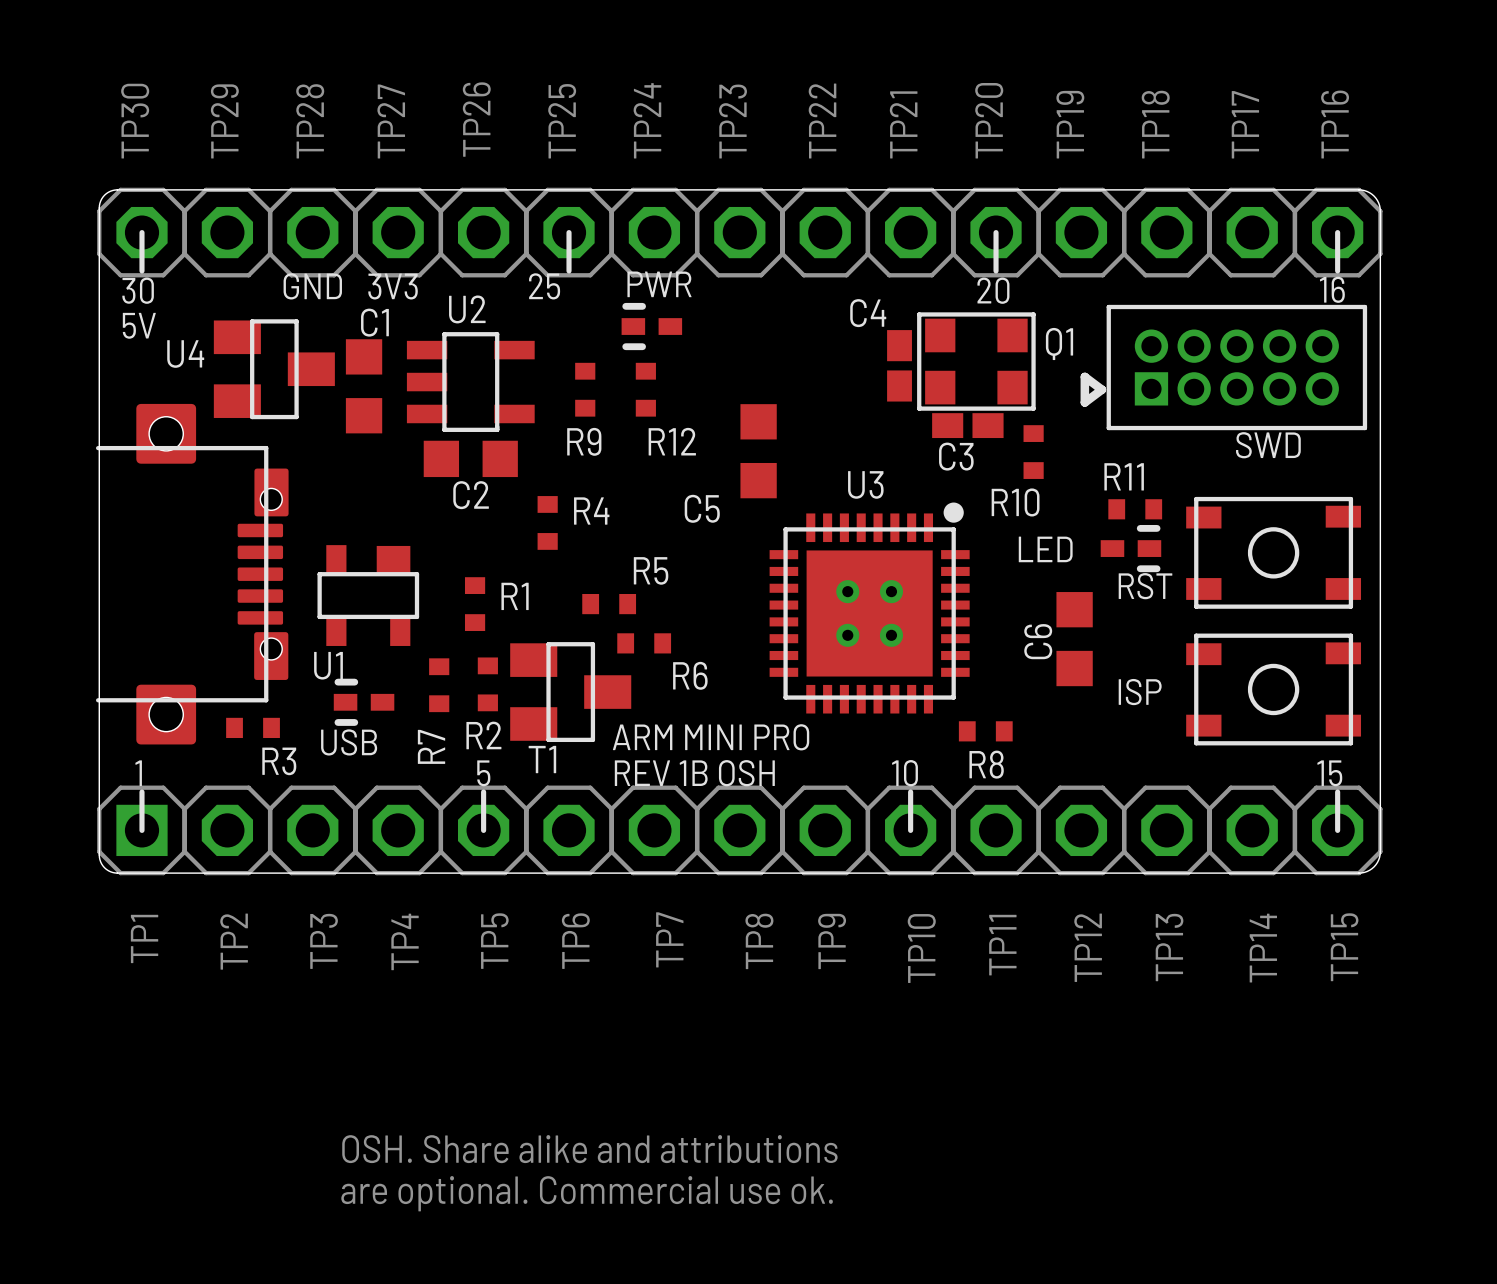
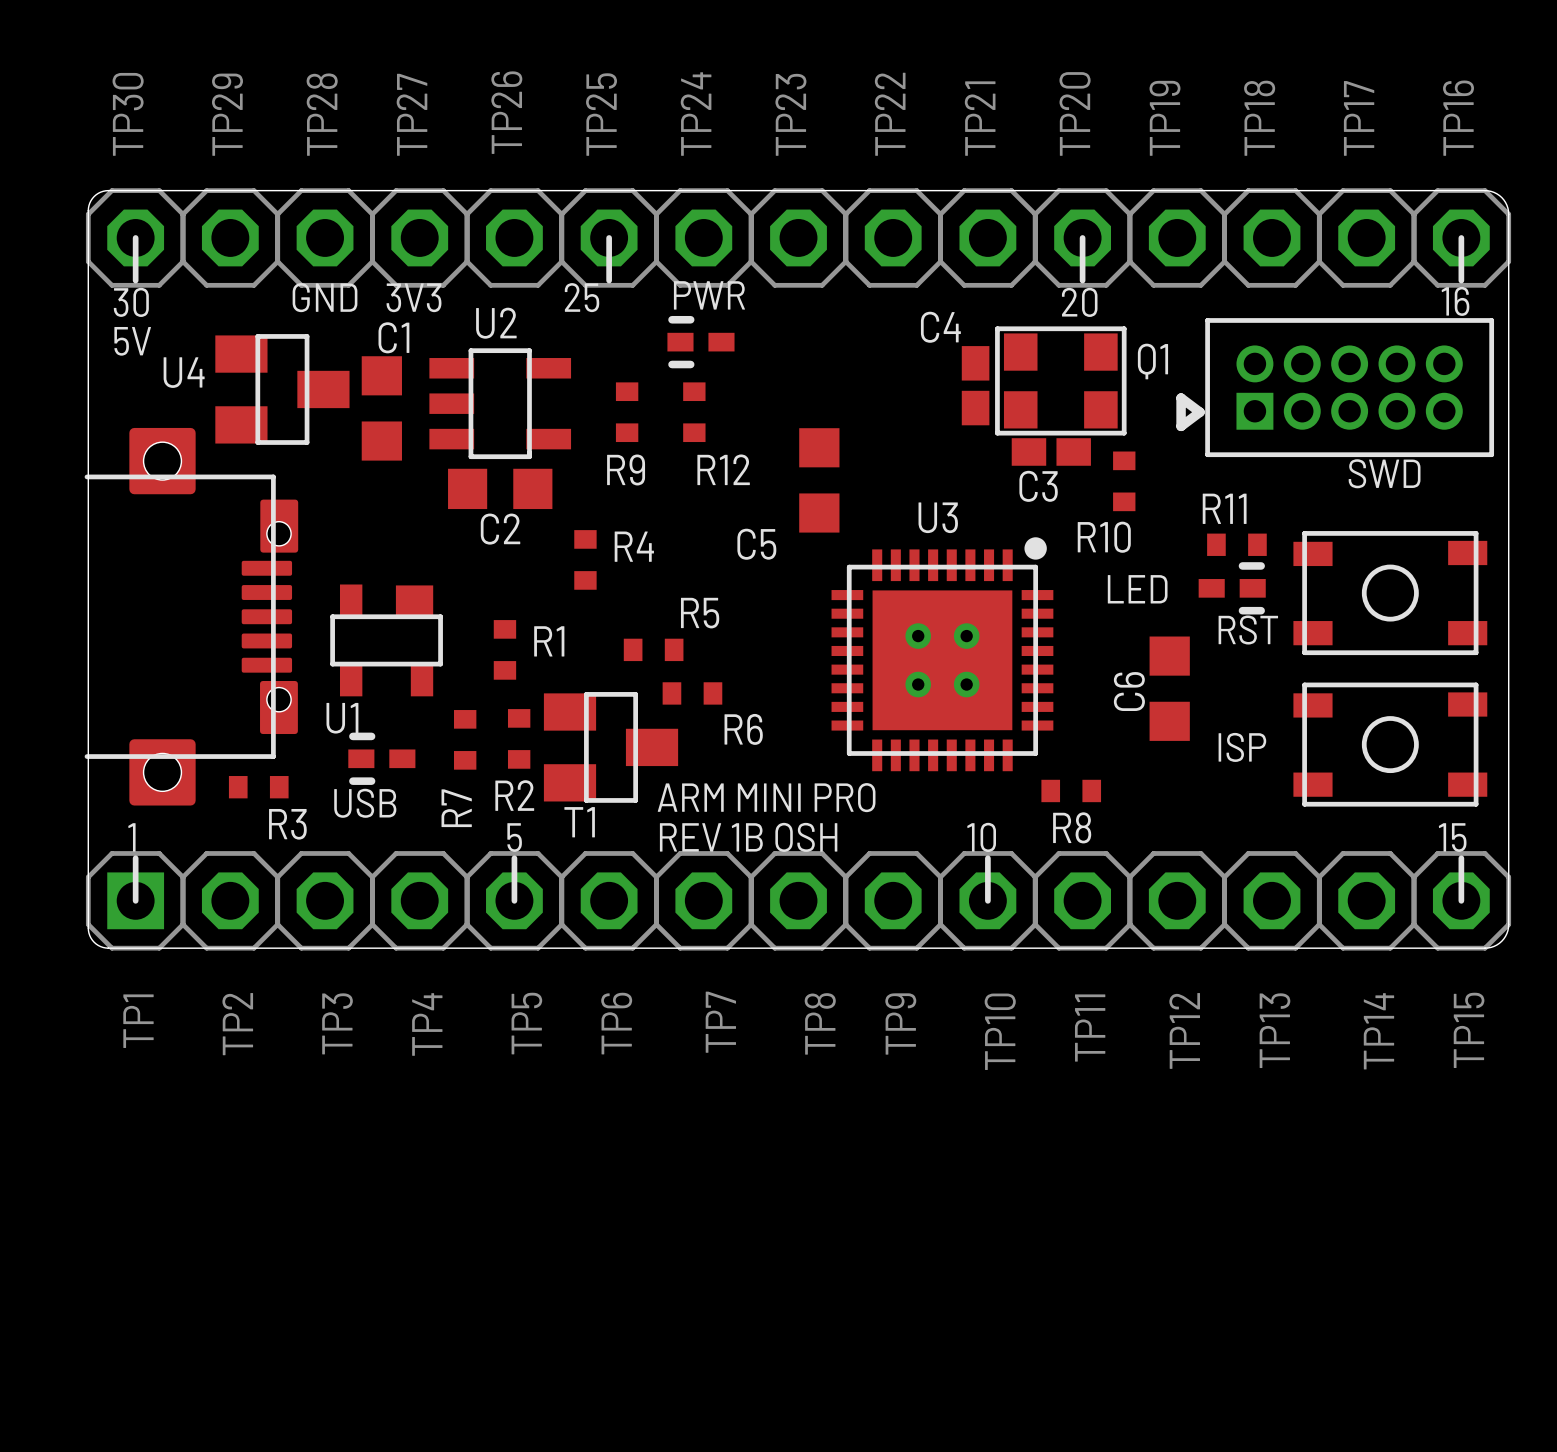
text: OSH. Share alike and attributions (589, 1149) -> none
text: are optional. Commercial use ok. (587, 1193) -> none

